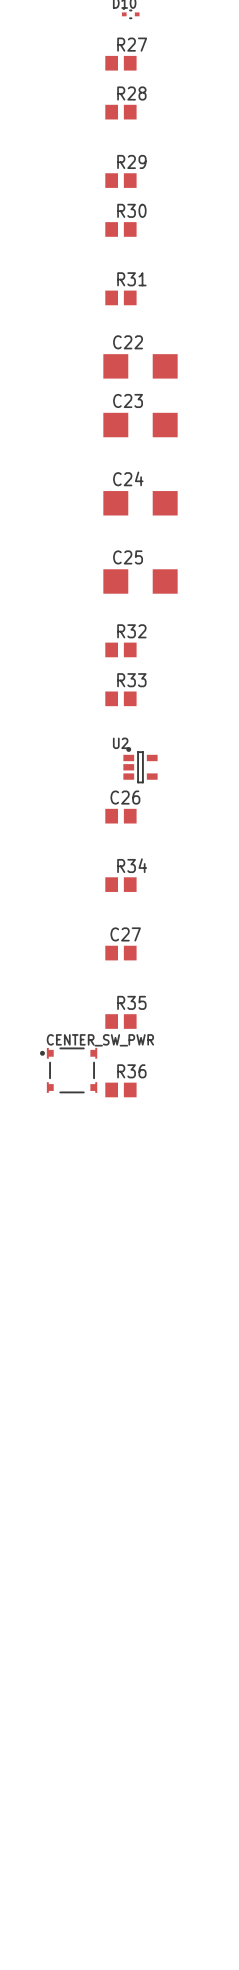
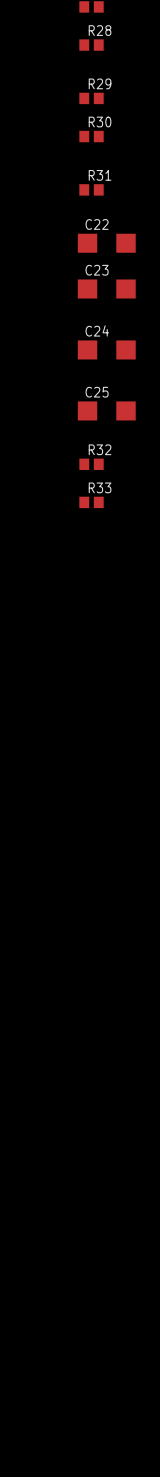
U2: (140, 765) -> none
C26: (120, 816) -> none
R34: (120, 884) -> none
C27: (120, 953) -> none
R35: (120, 1021) -> none
CENTER_SW_PWR: (68, 1070) -> none
R36: (120, 1089) -> none

